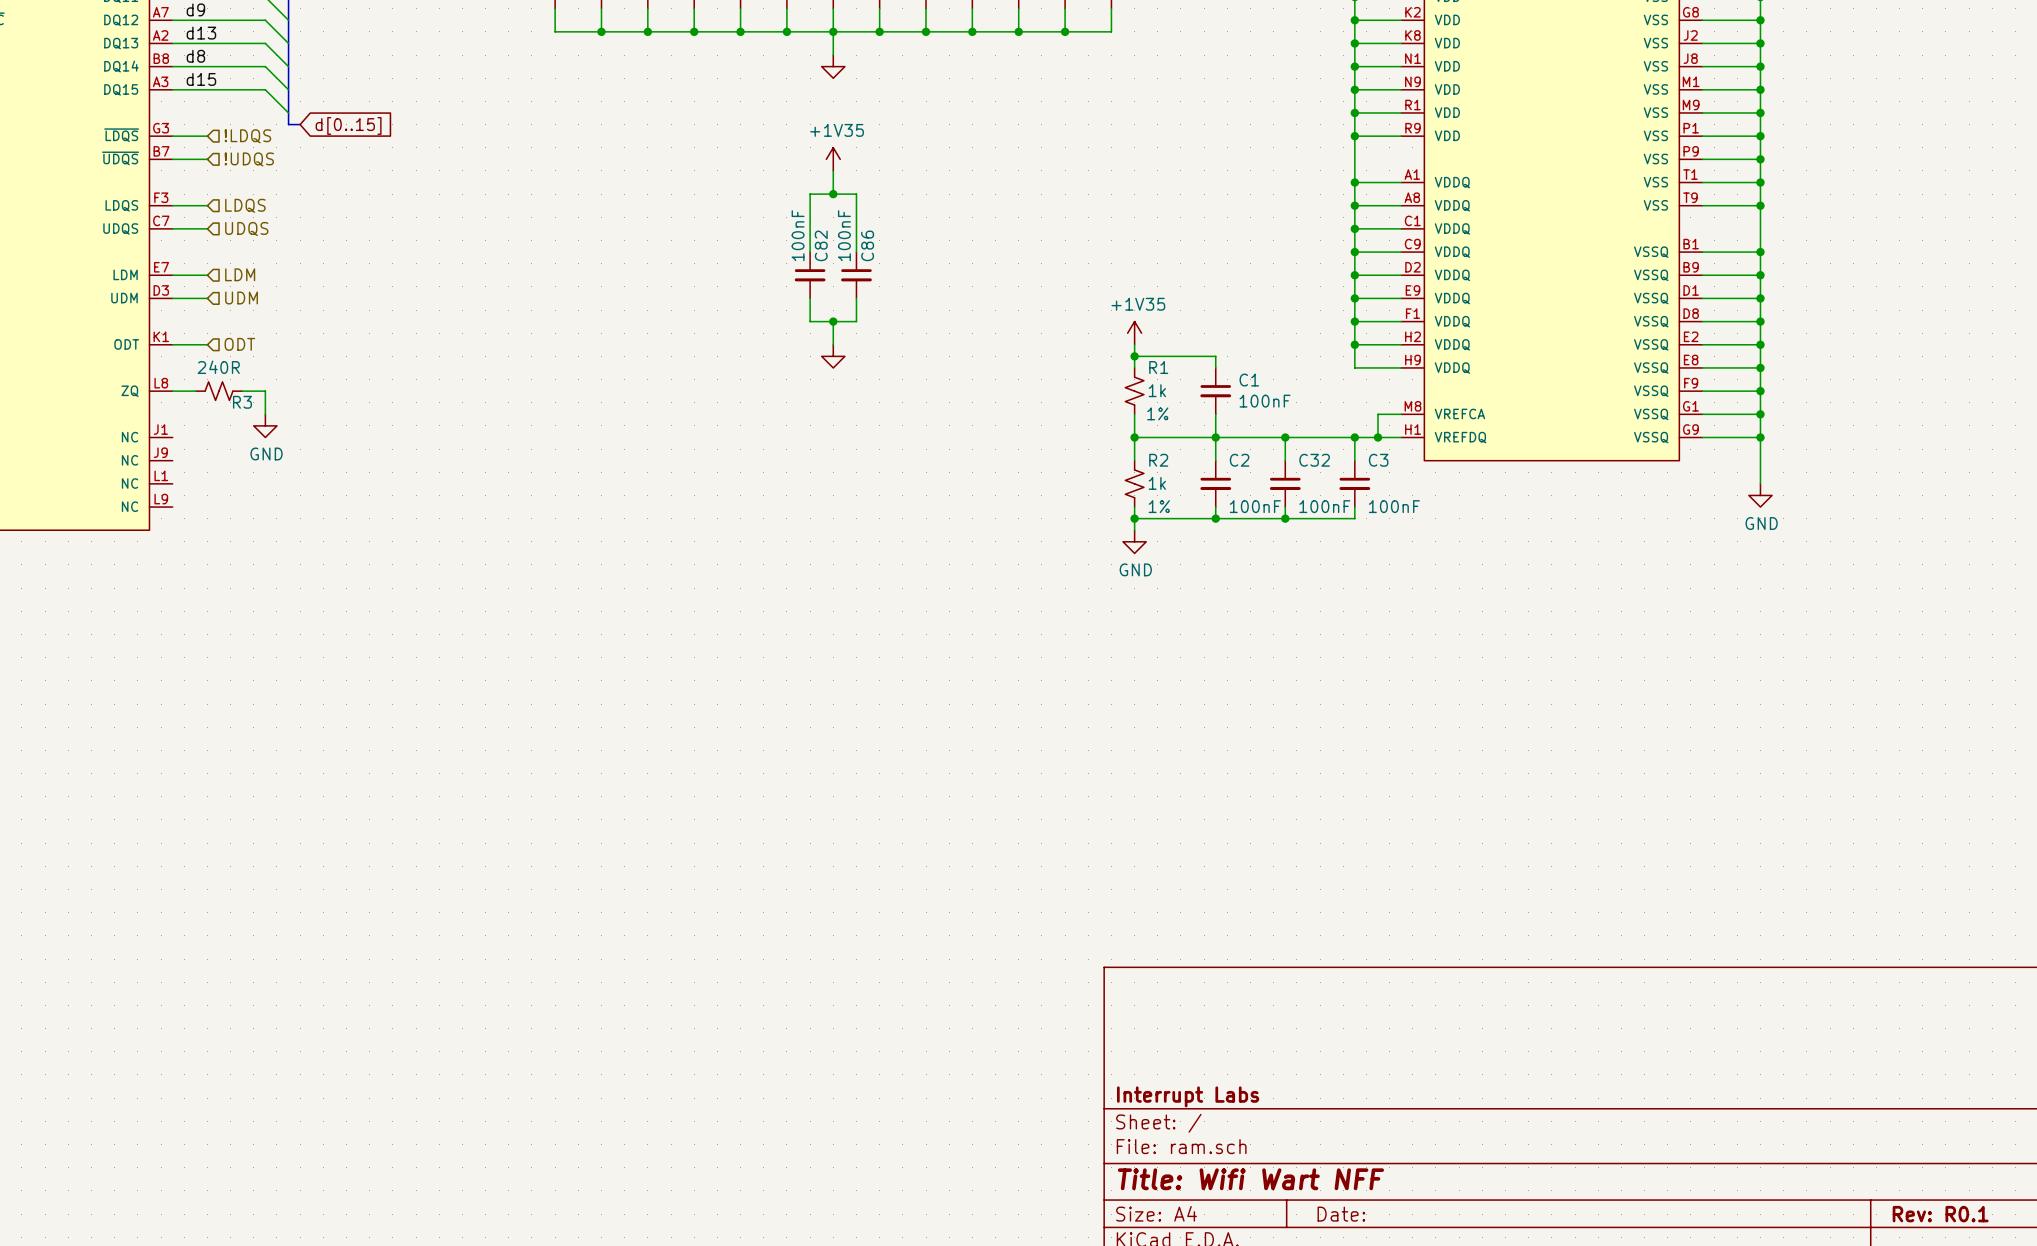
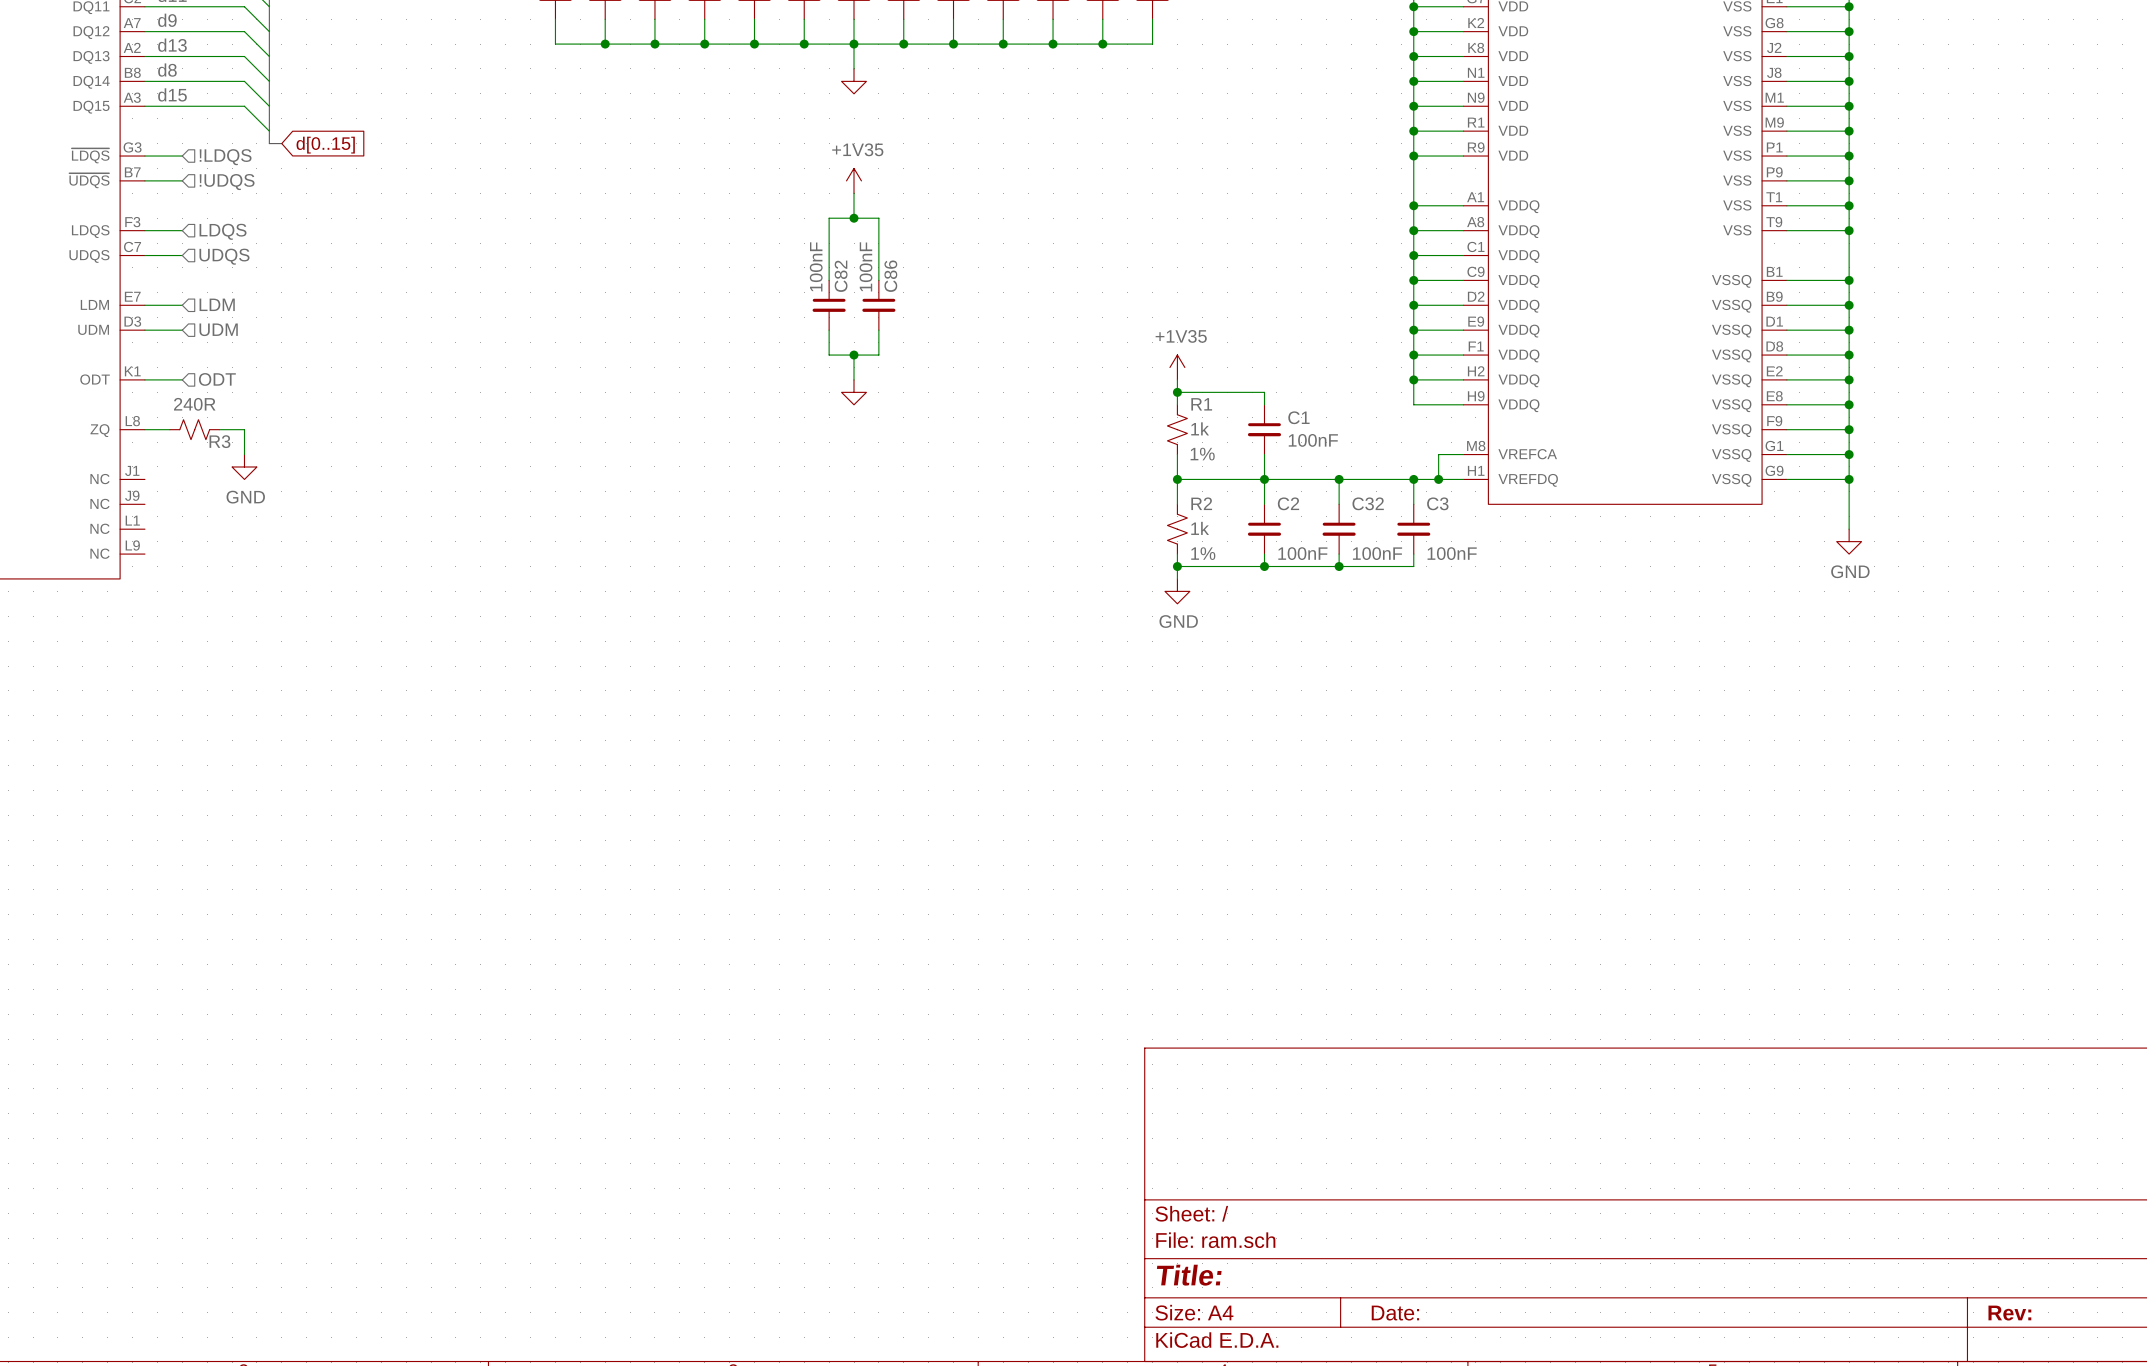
title block: Interrupt Labs (1188, 1096) -> none
title block: Title: Wifi Wart NFF (1250, 1179) -> Title: (1189, 1275)
title block: Rev: R0.1 (1940, 1214) -> Rev: (2009, 1313)

